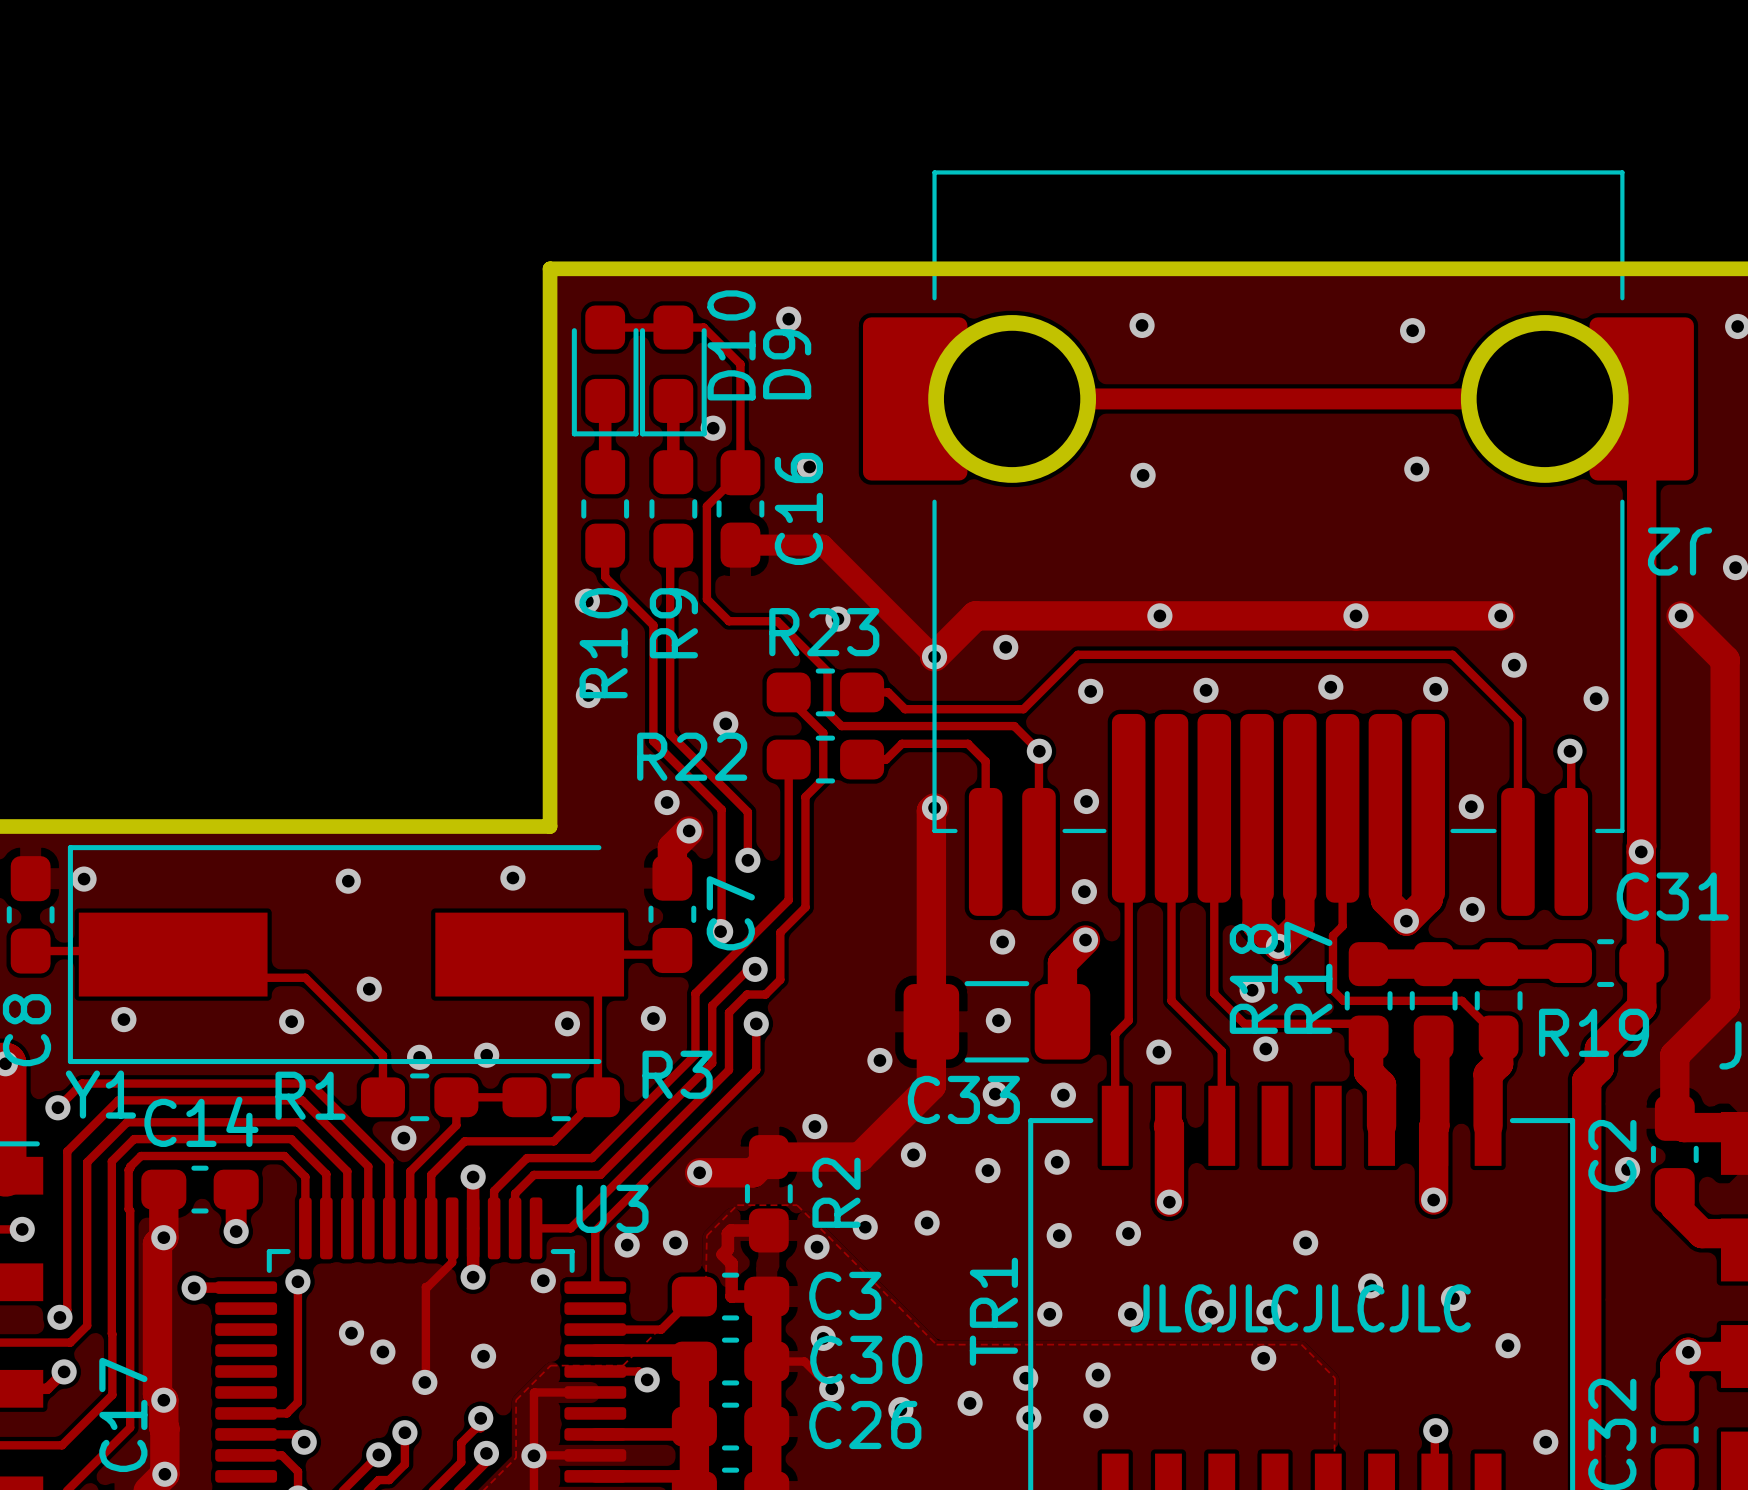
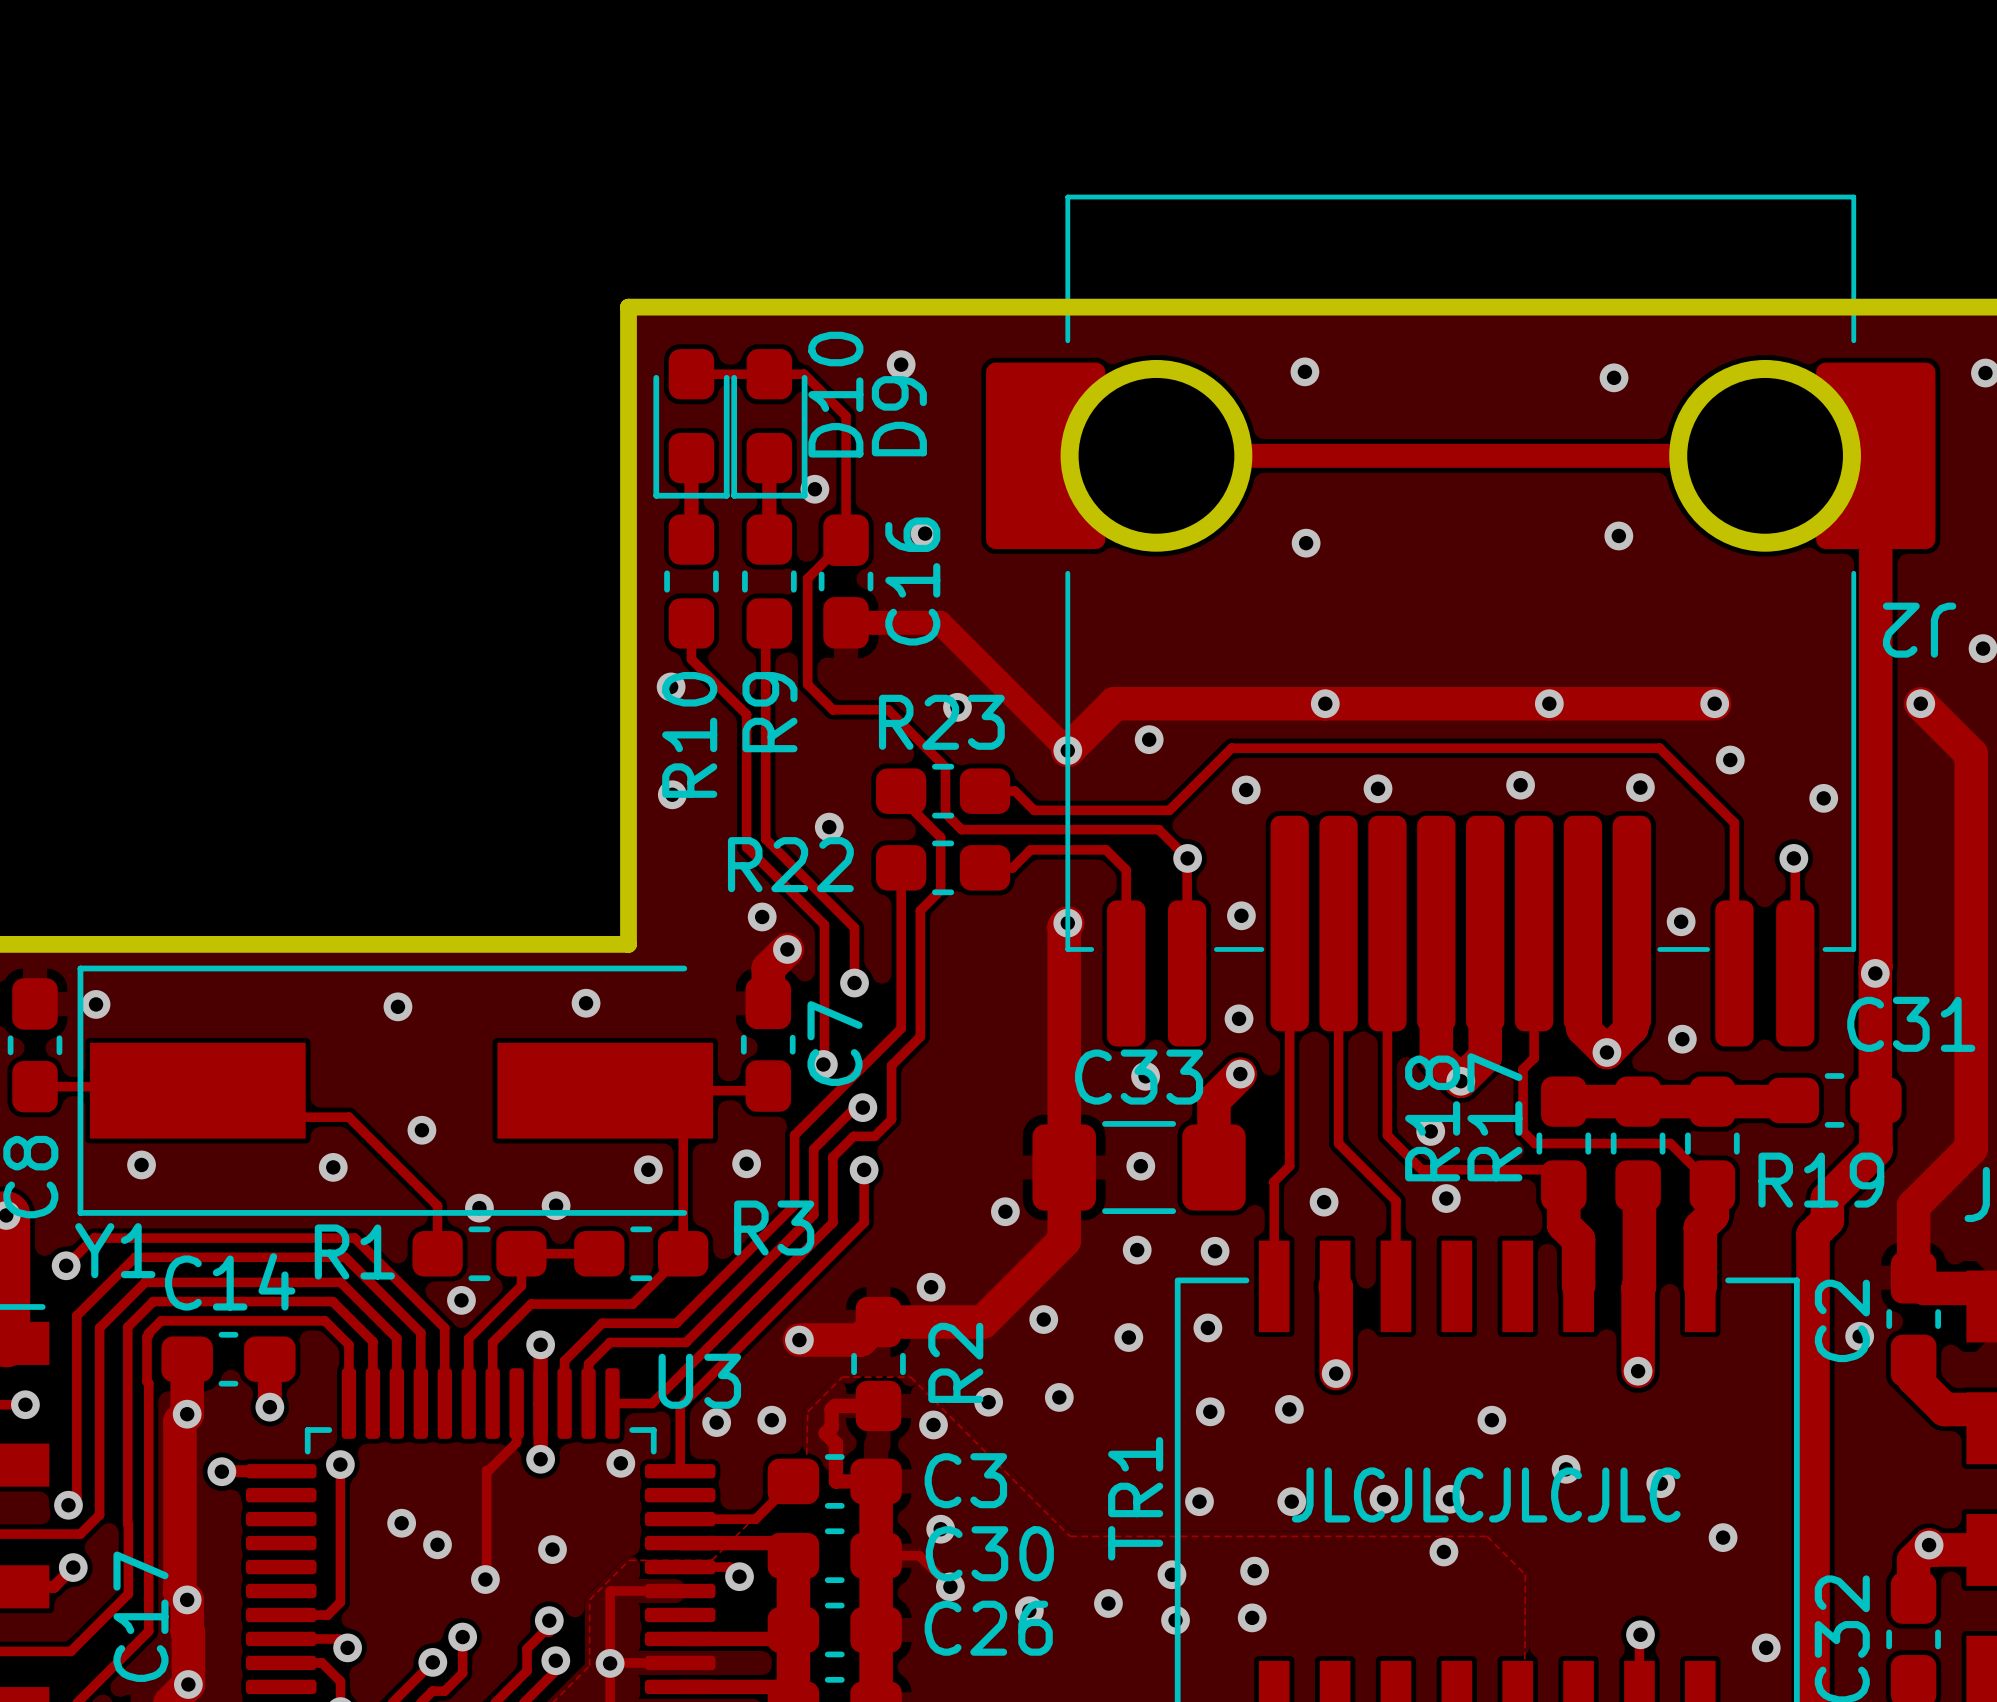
C33 name position: C33 (963, 1099) -> C33 (1139, 1077)

